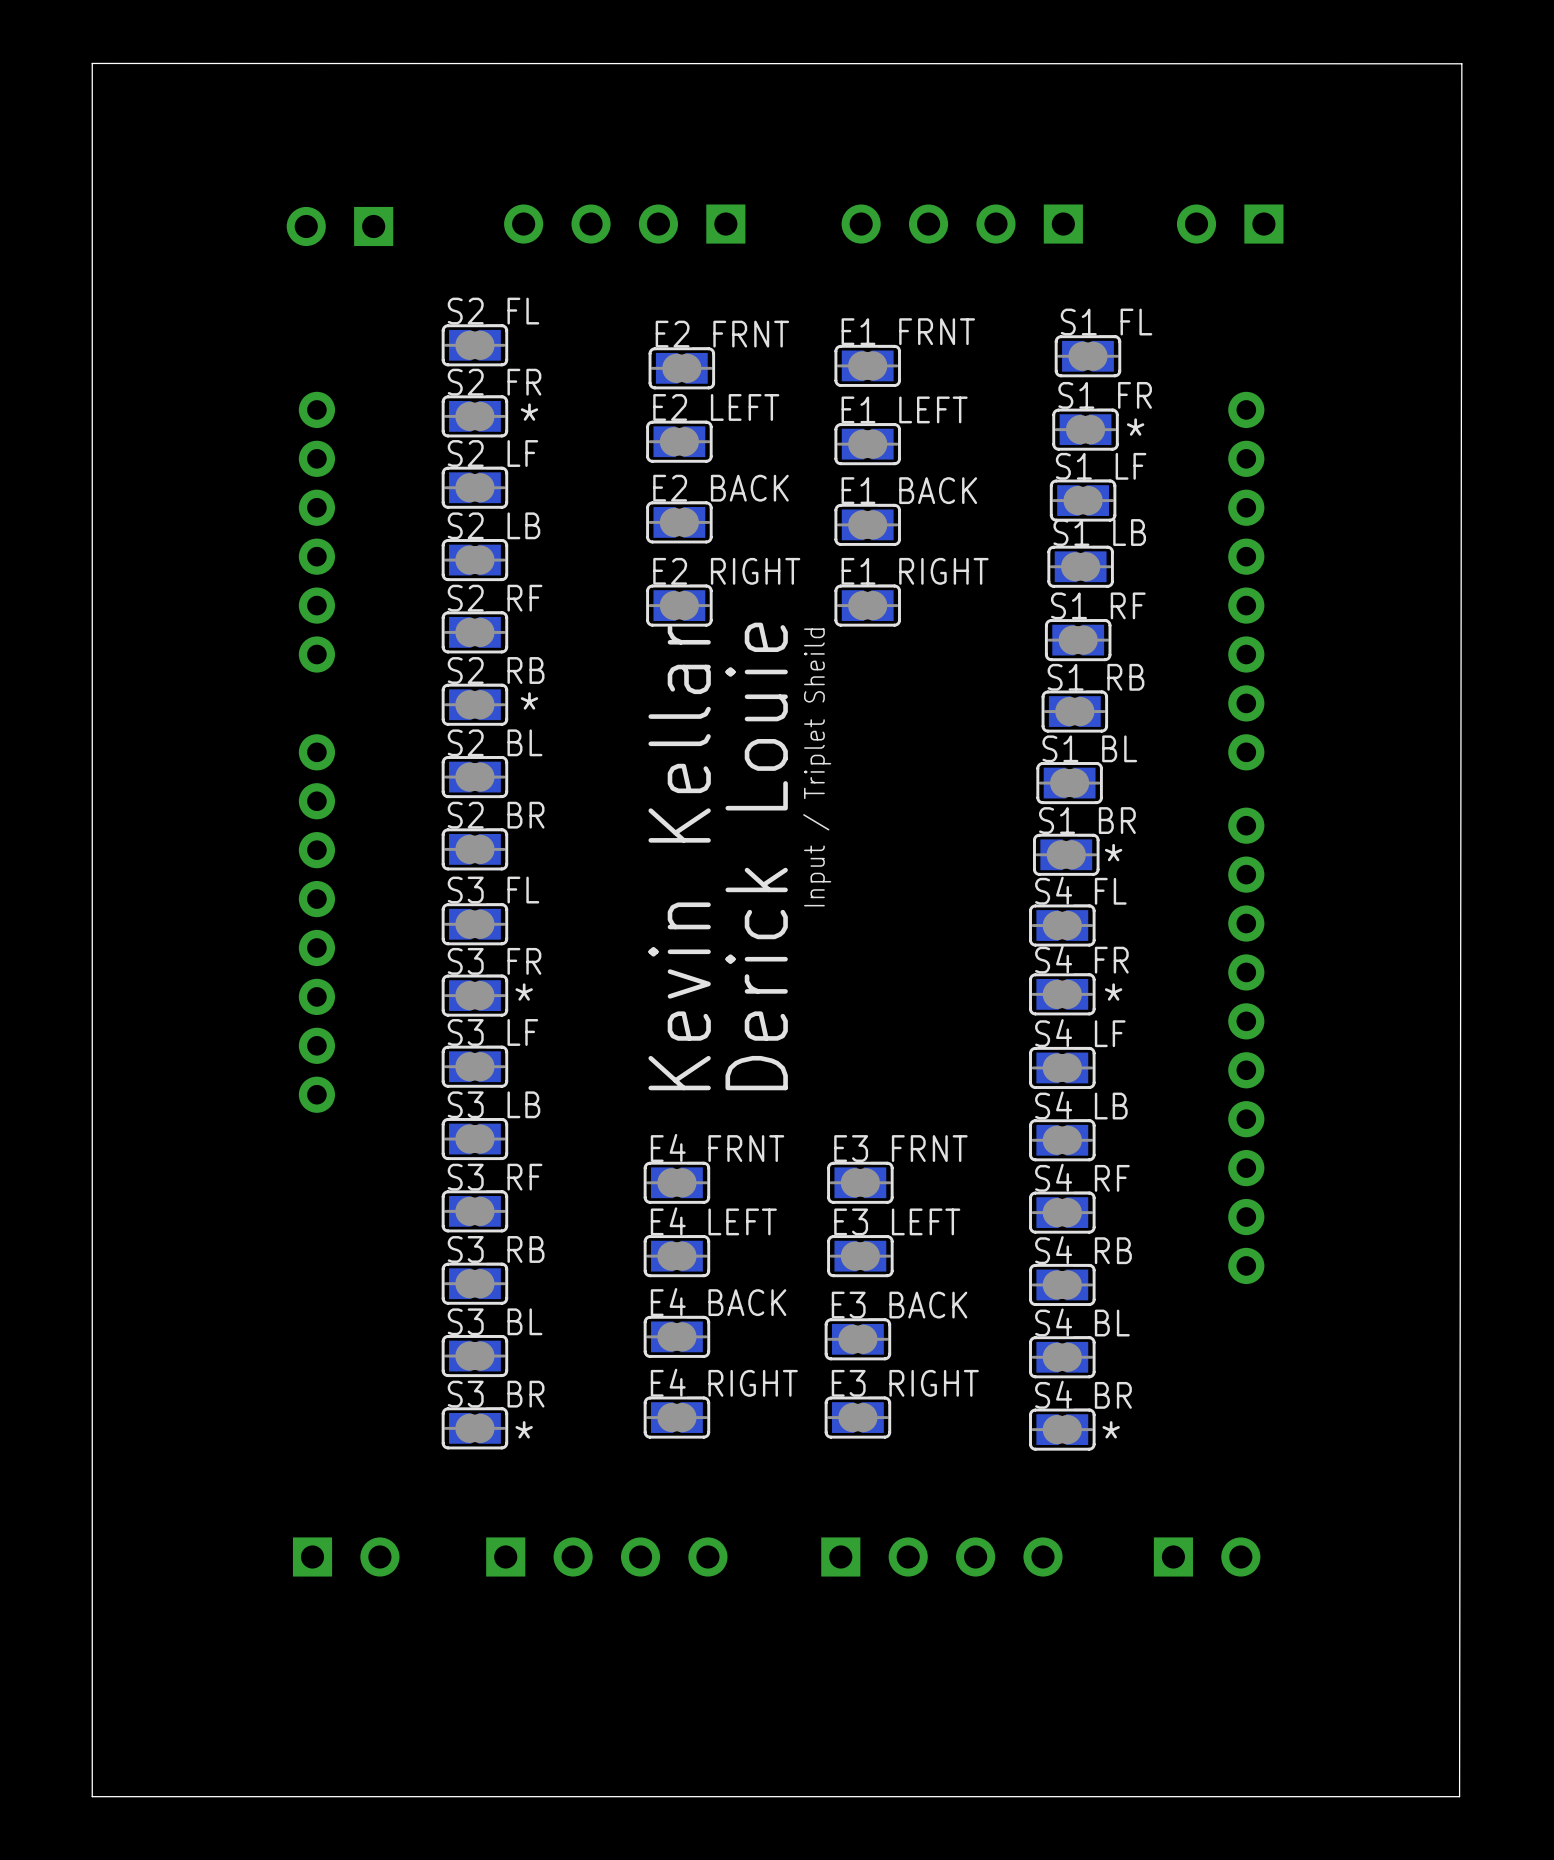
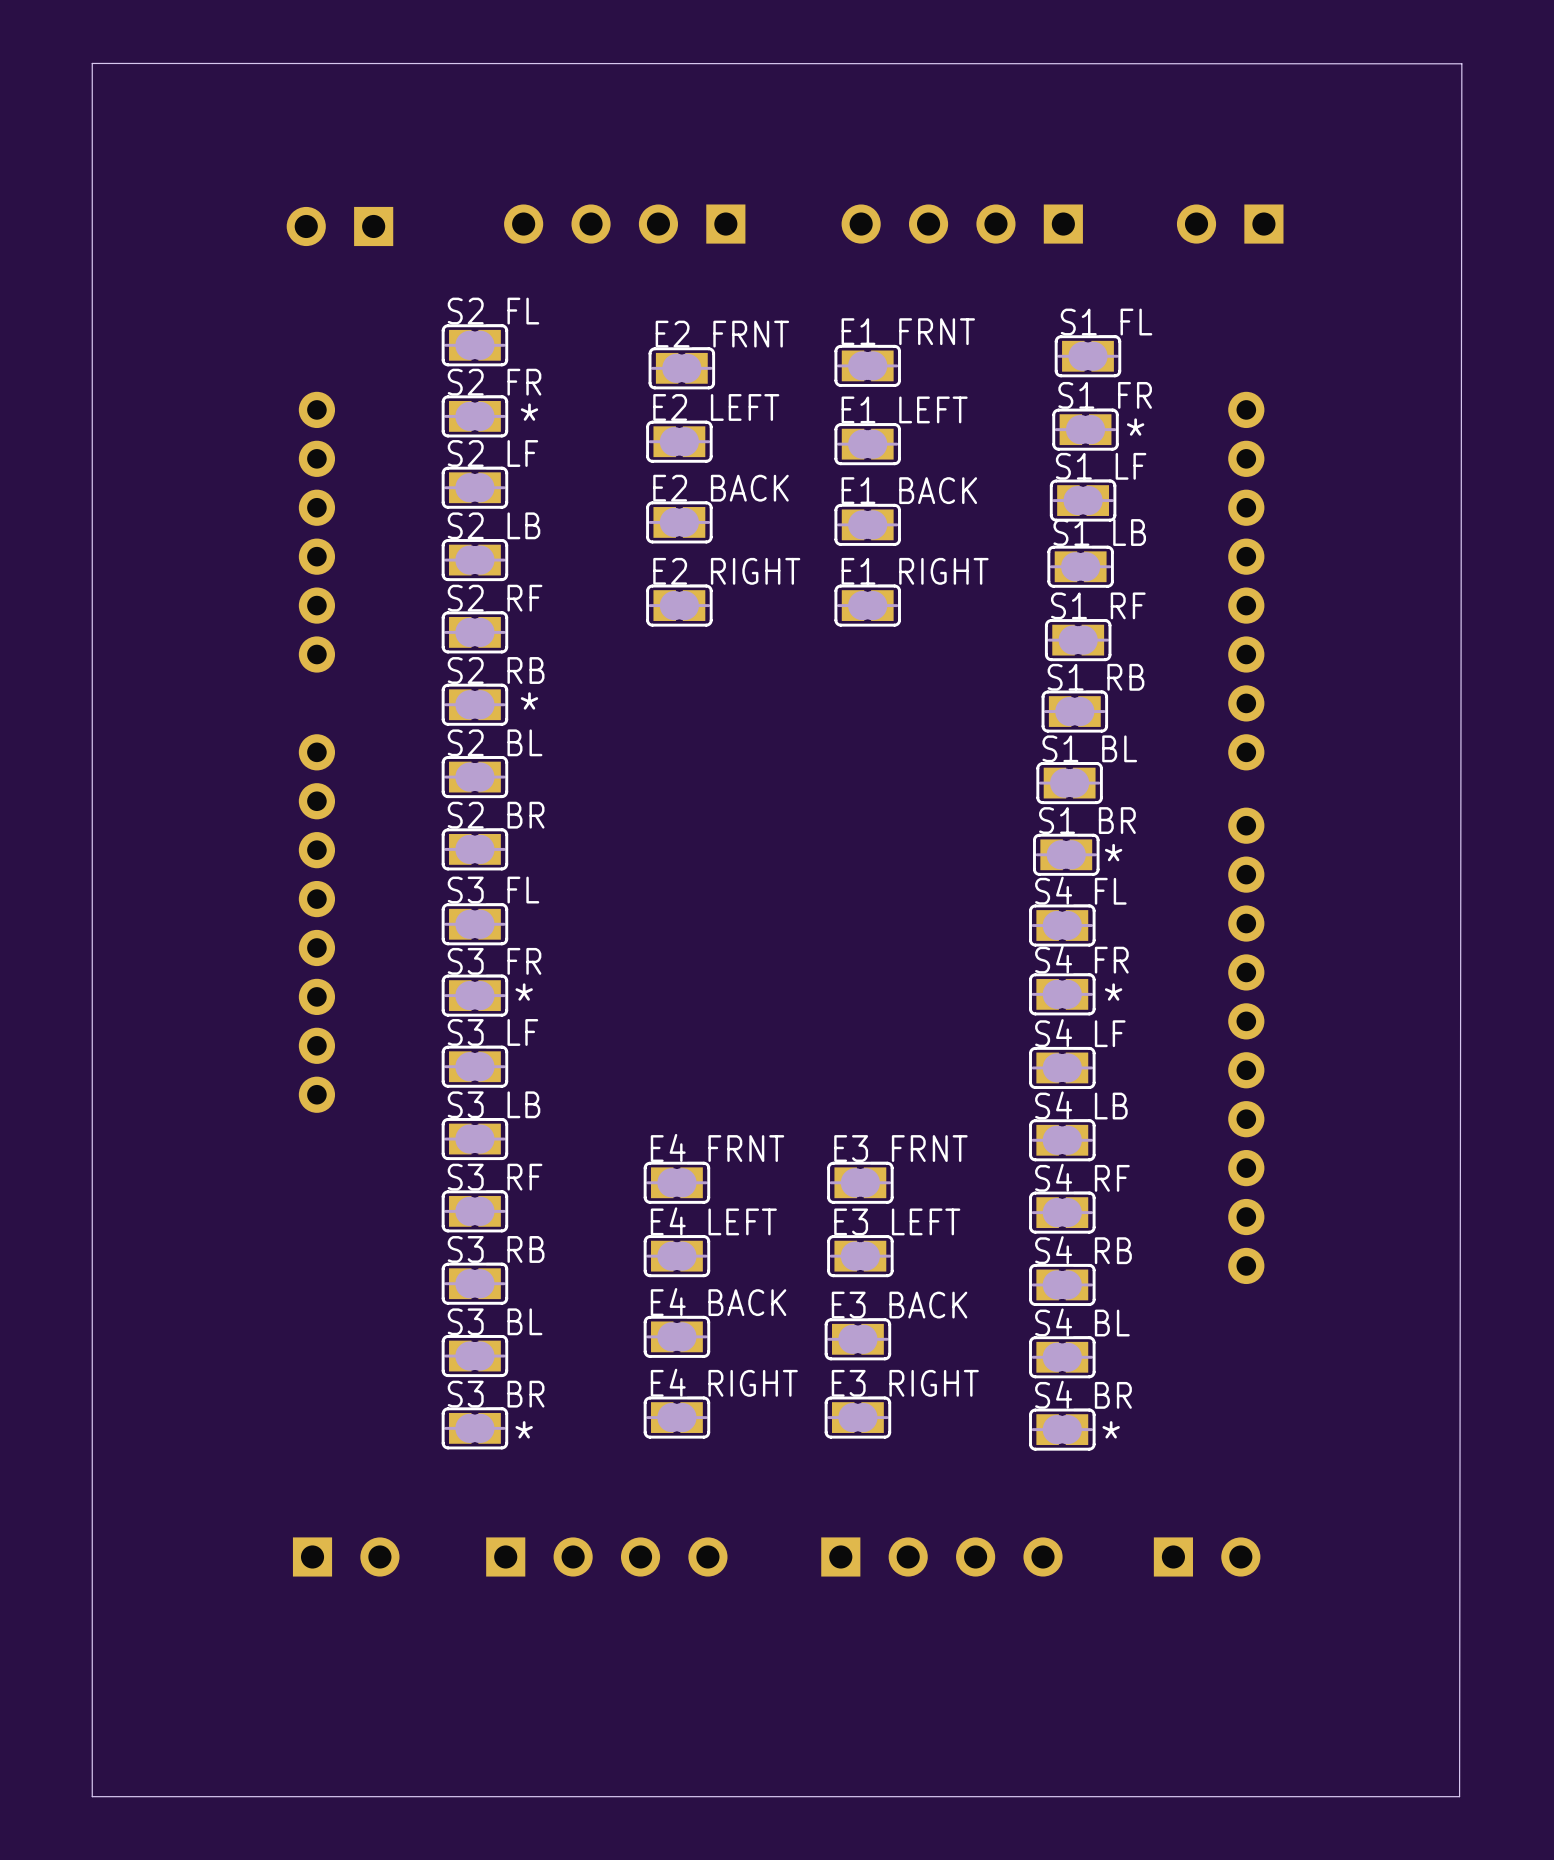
text: Input / Triplet Sheild (817, 767) -> none
text: Derick Louie (756, 856) -> none
text: Kevin Kellar (679, 857) -> none

